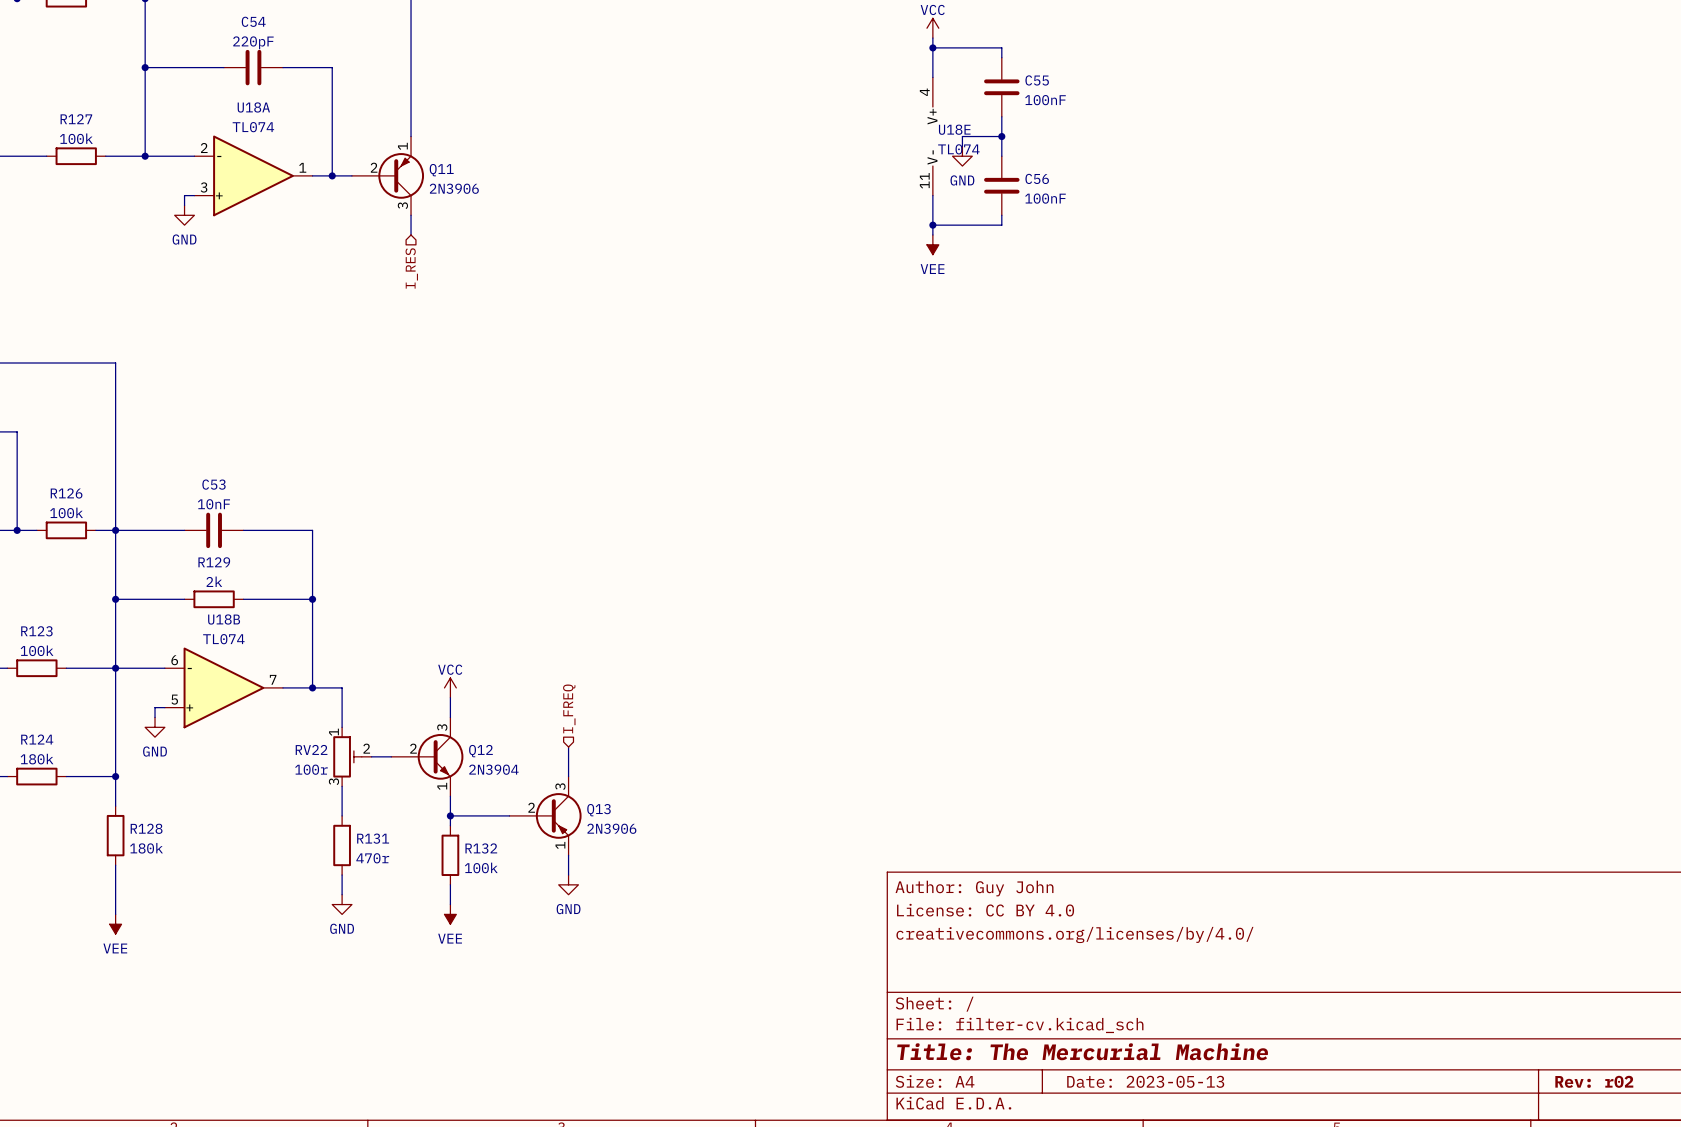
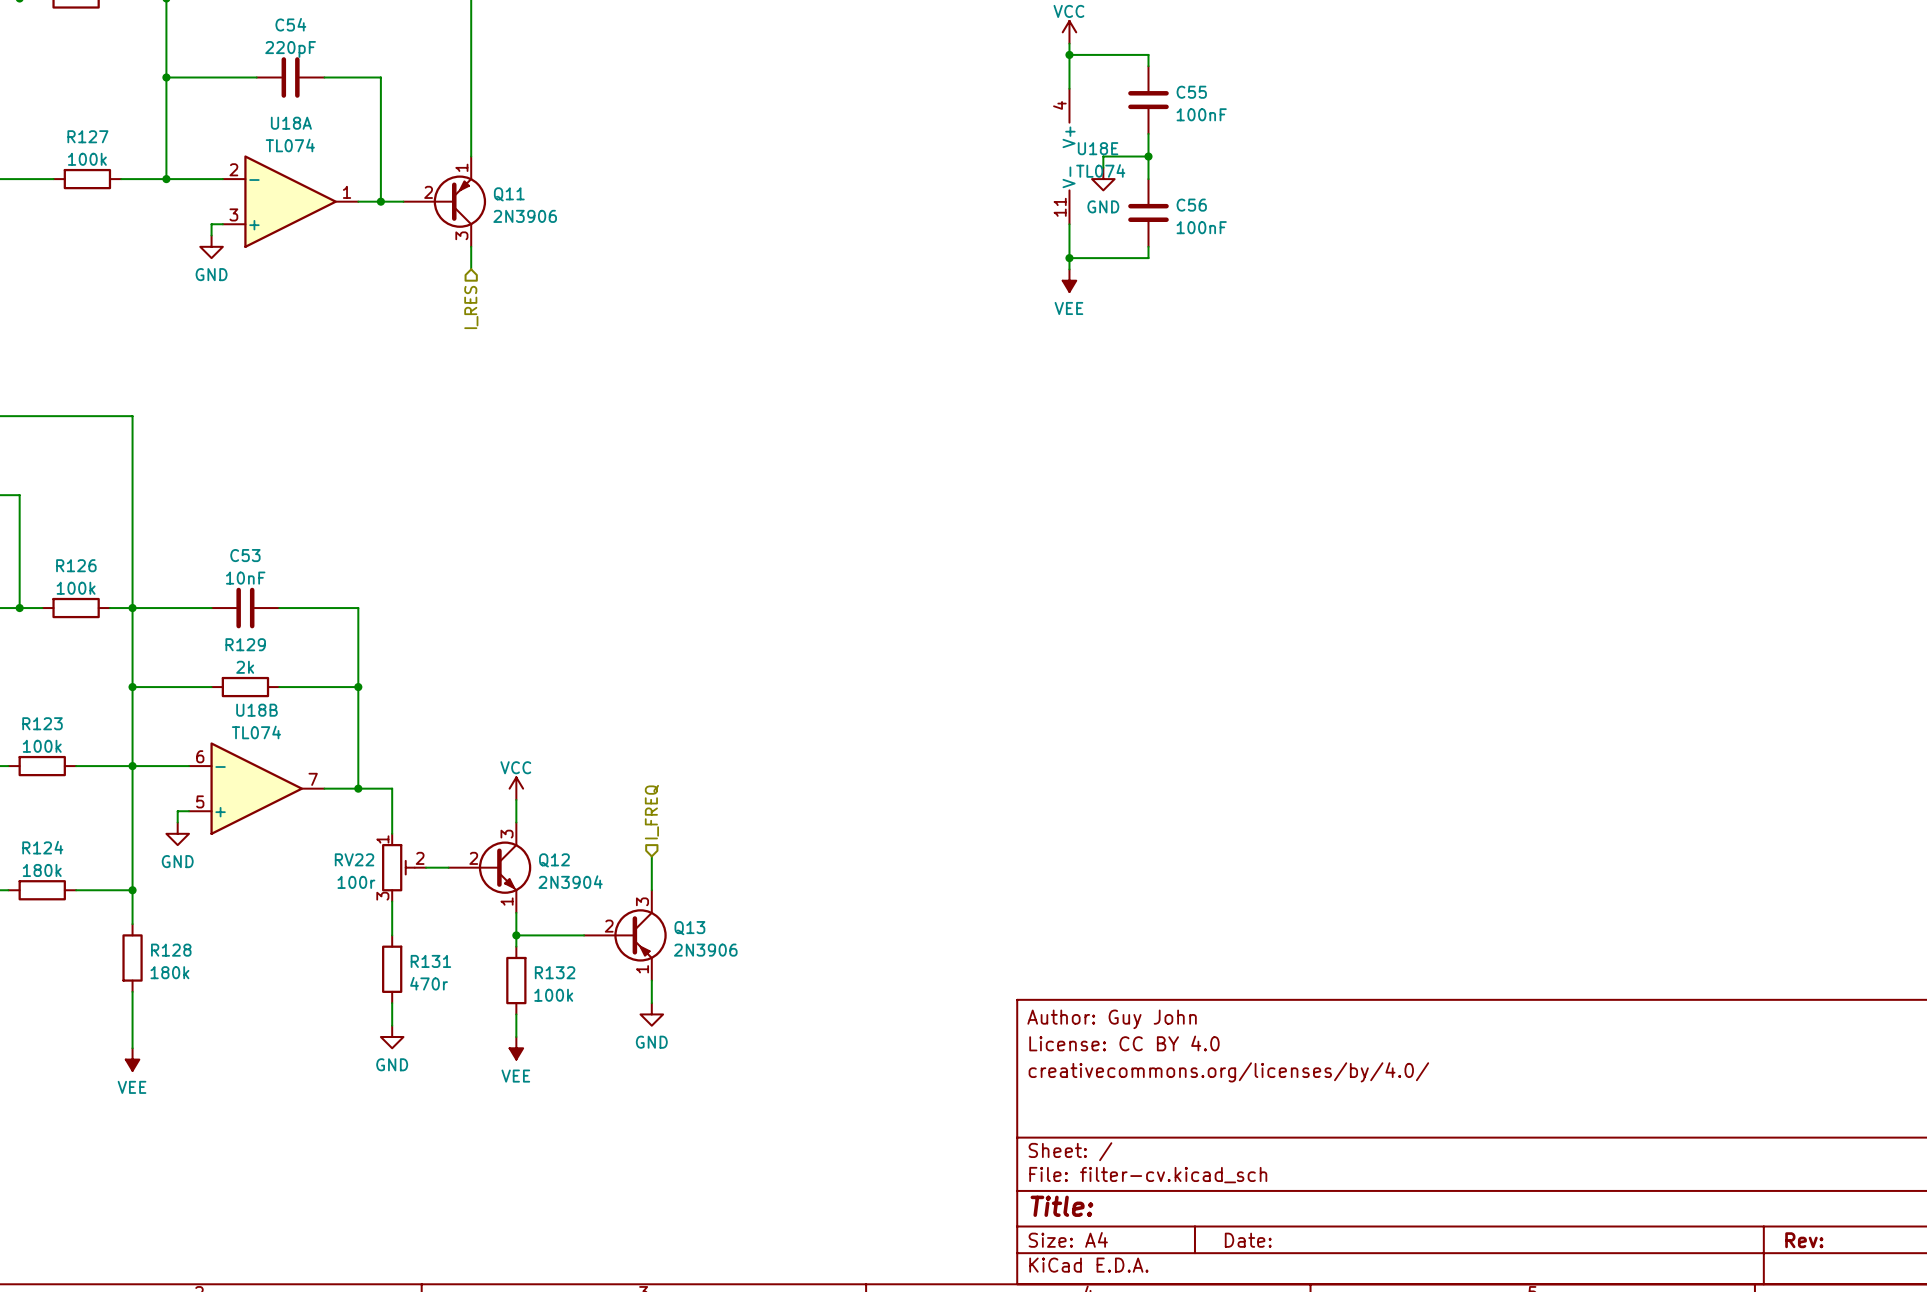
title block: Title: The Mercurial Machine (1082, 1051) -> Title: (1061, 1206)
title block: Date: 2023-05-13 (1145, 1081) -> Date: (1248, 1240)
title block: Rev: r02 (1594, 1081) -> Rev: (1804, 1240)

